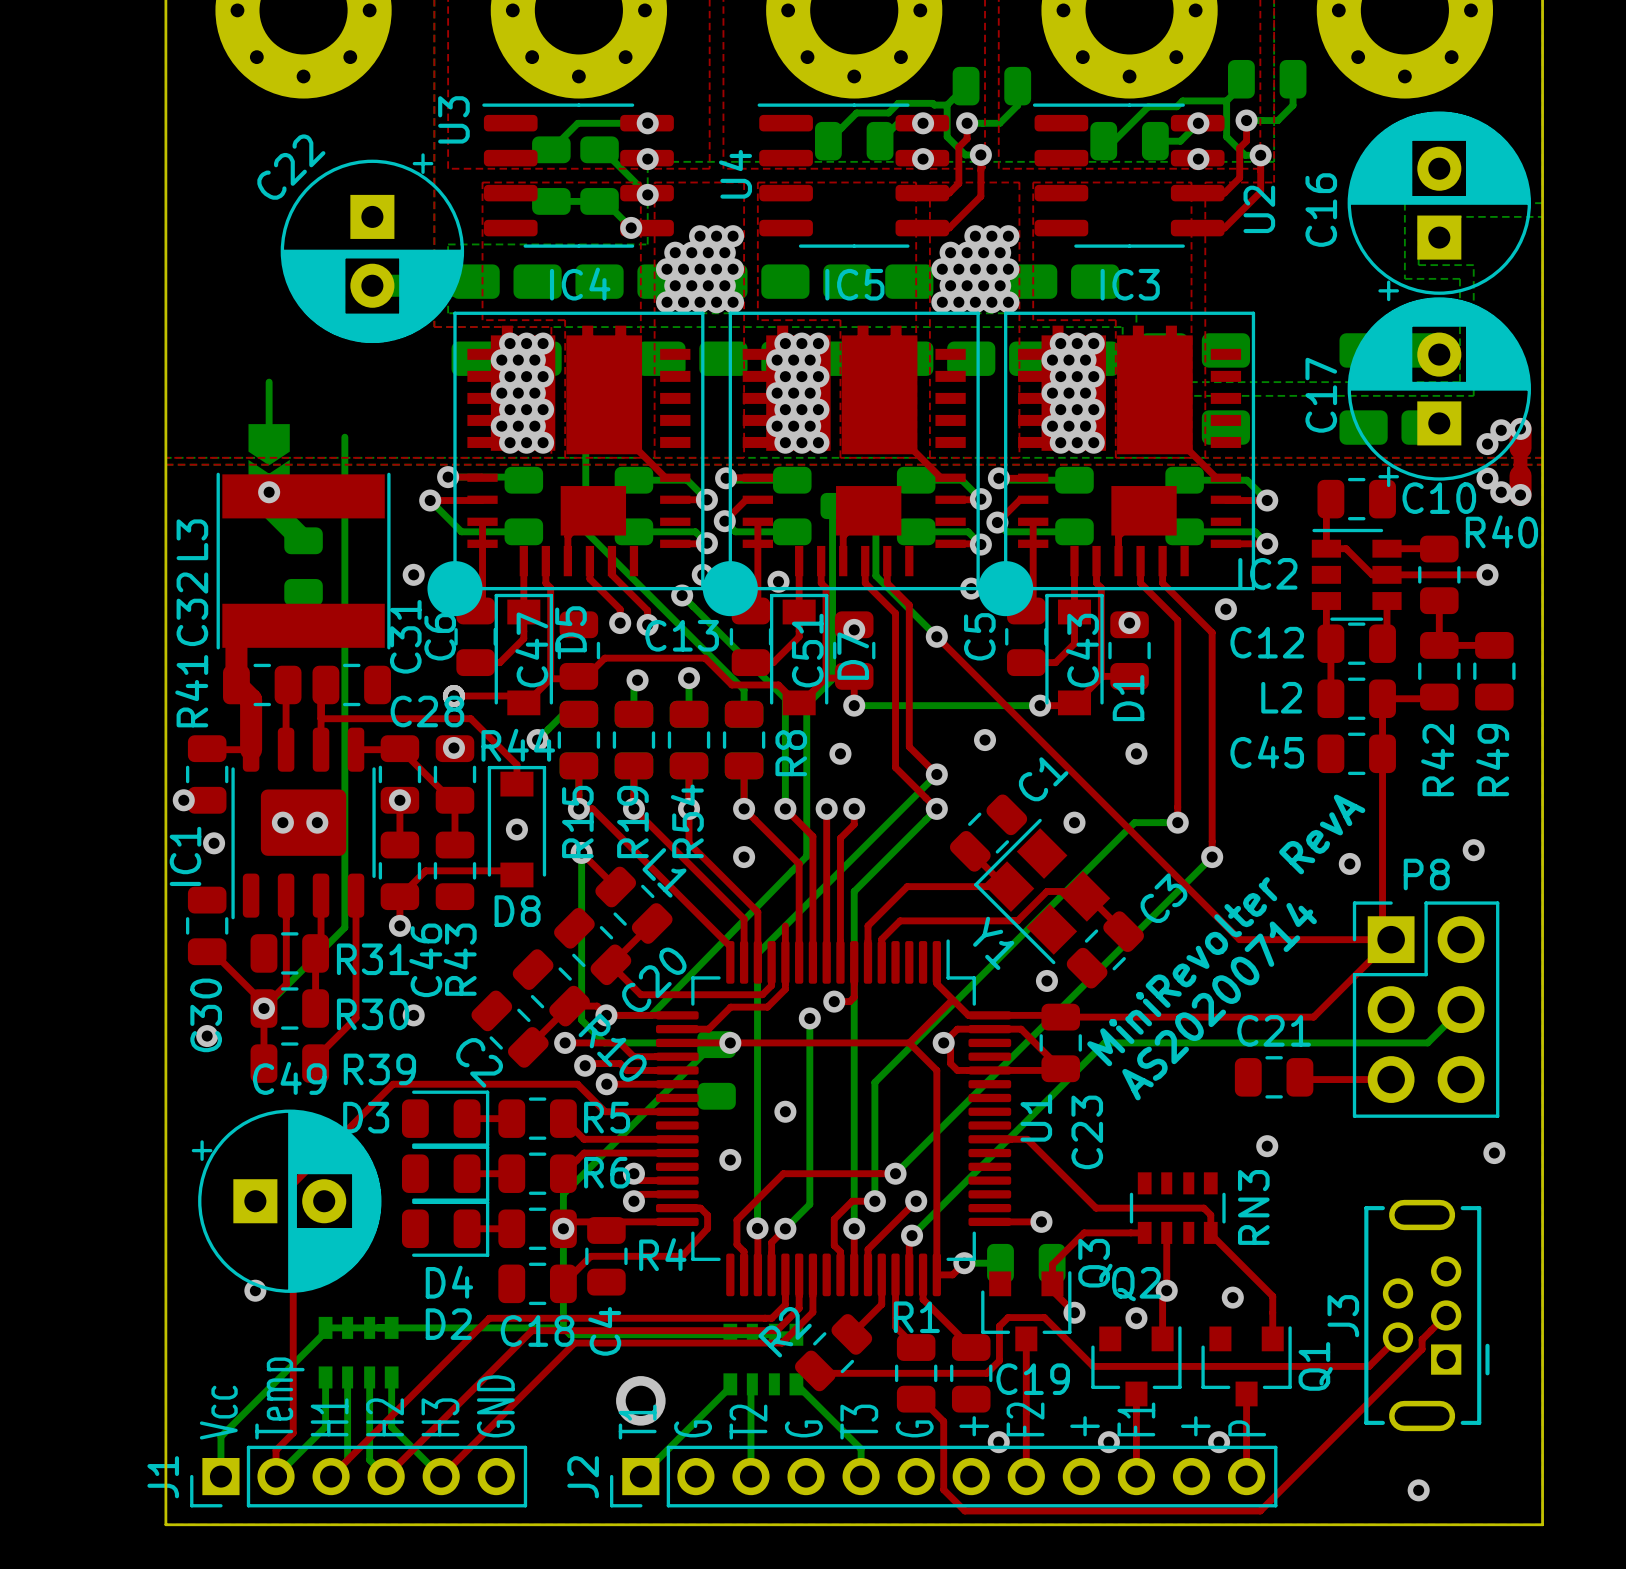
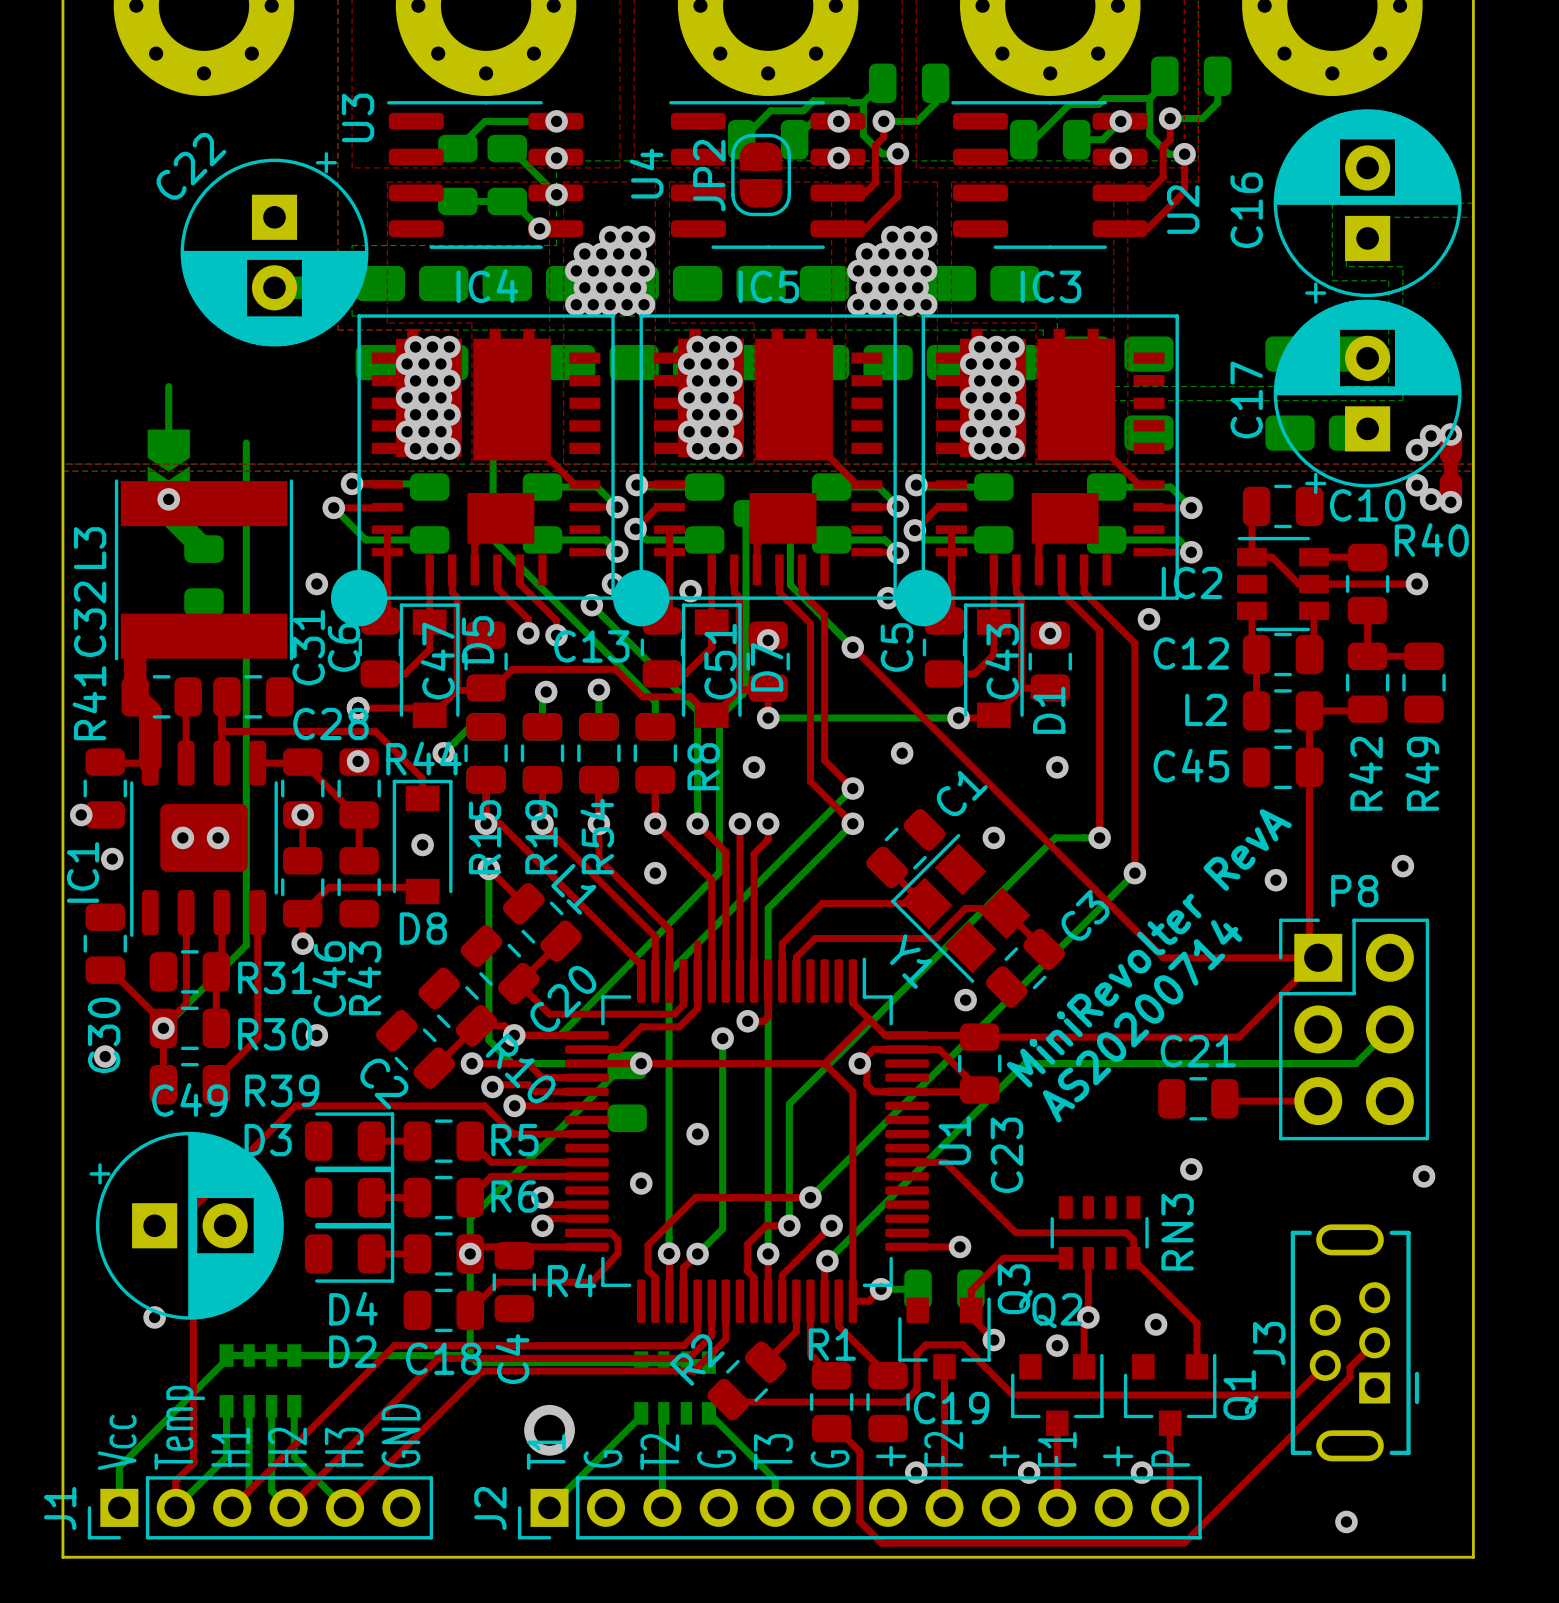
JP2: none -> (761, 174)

